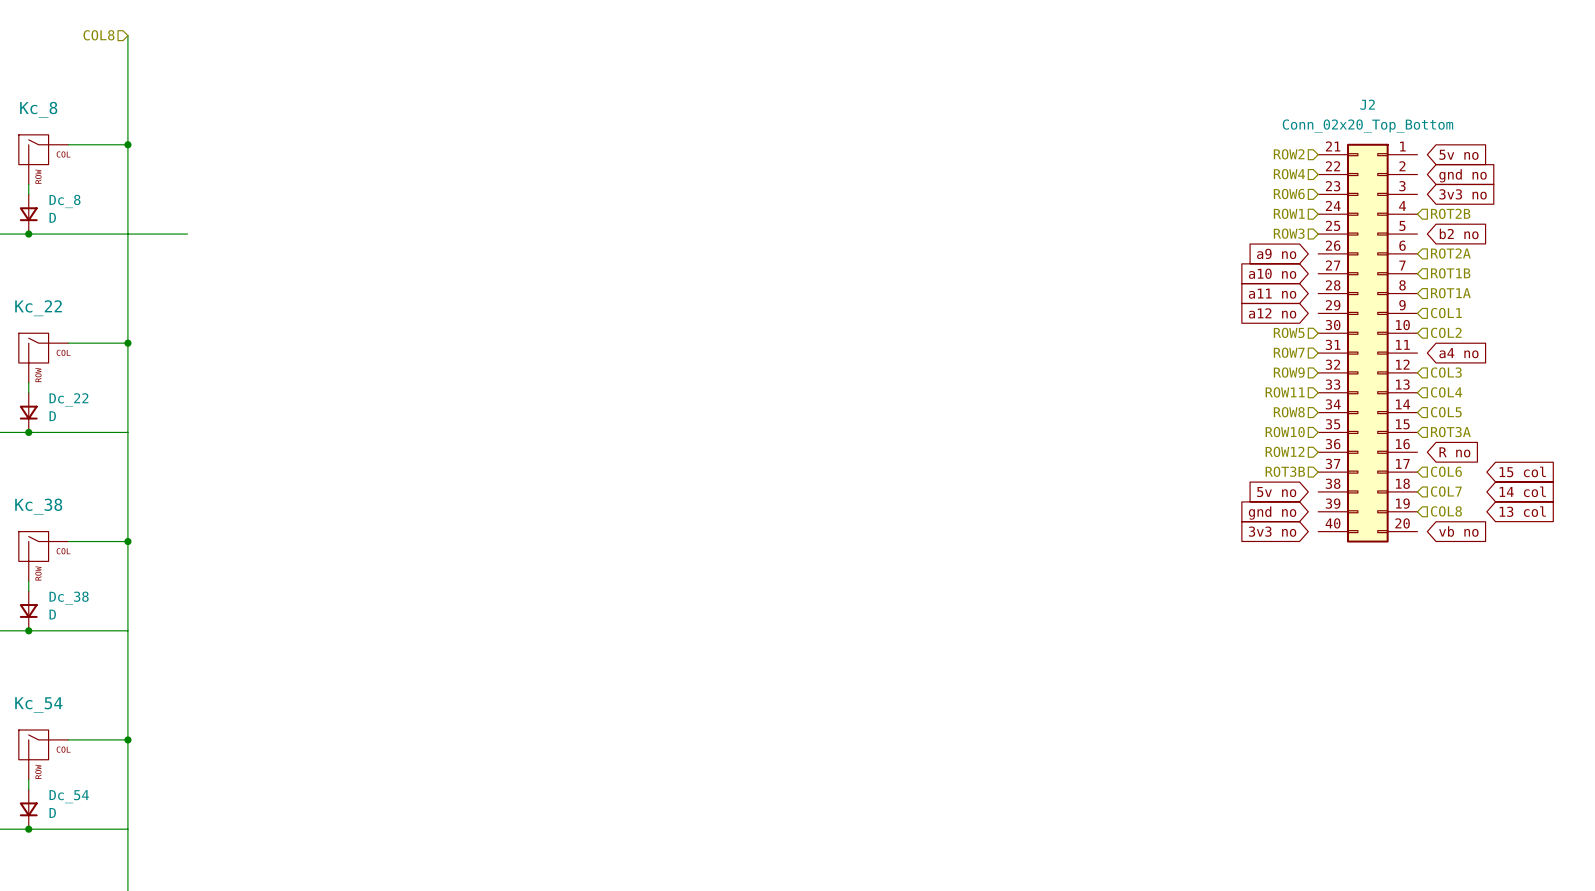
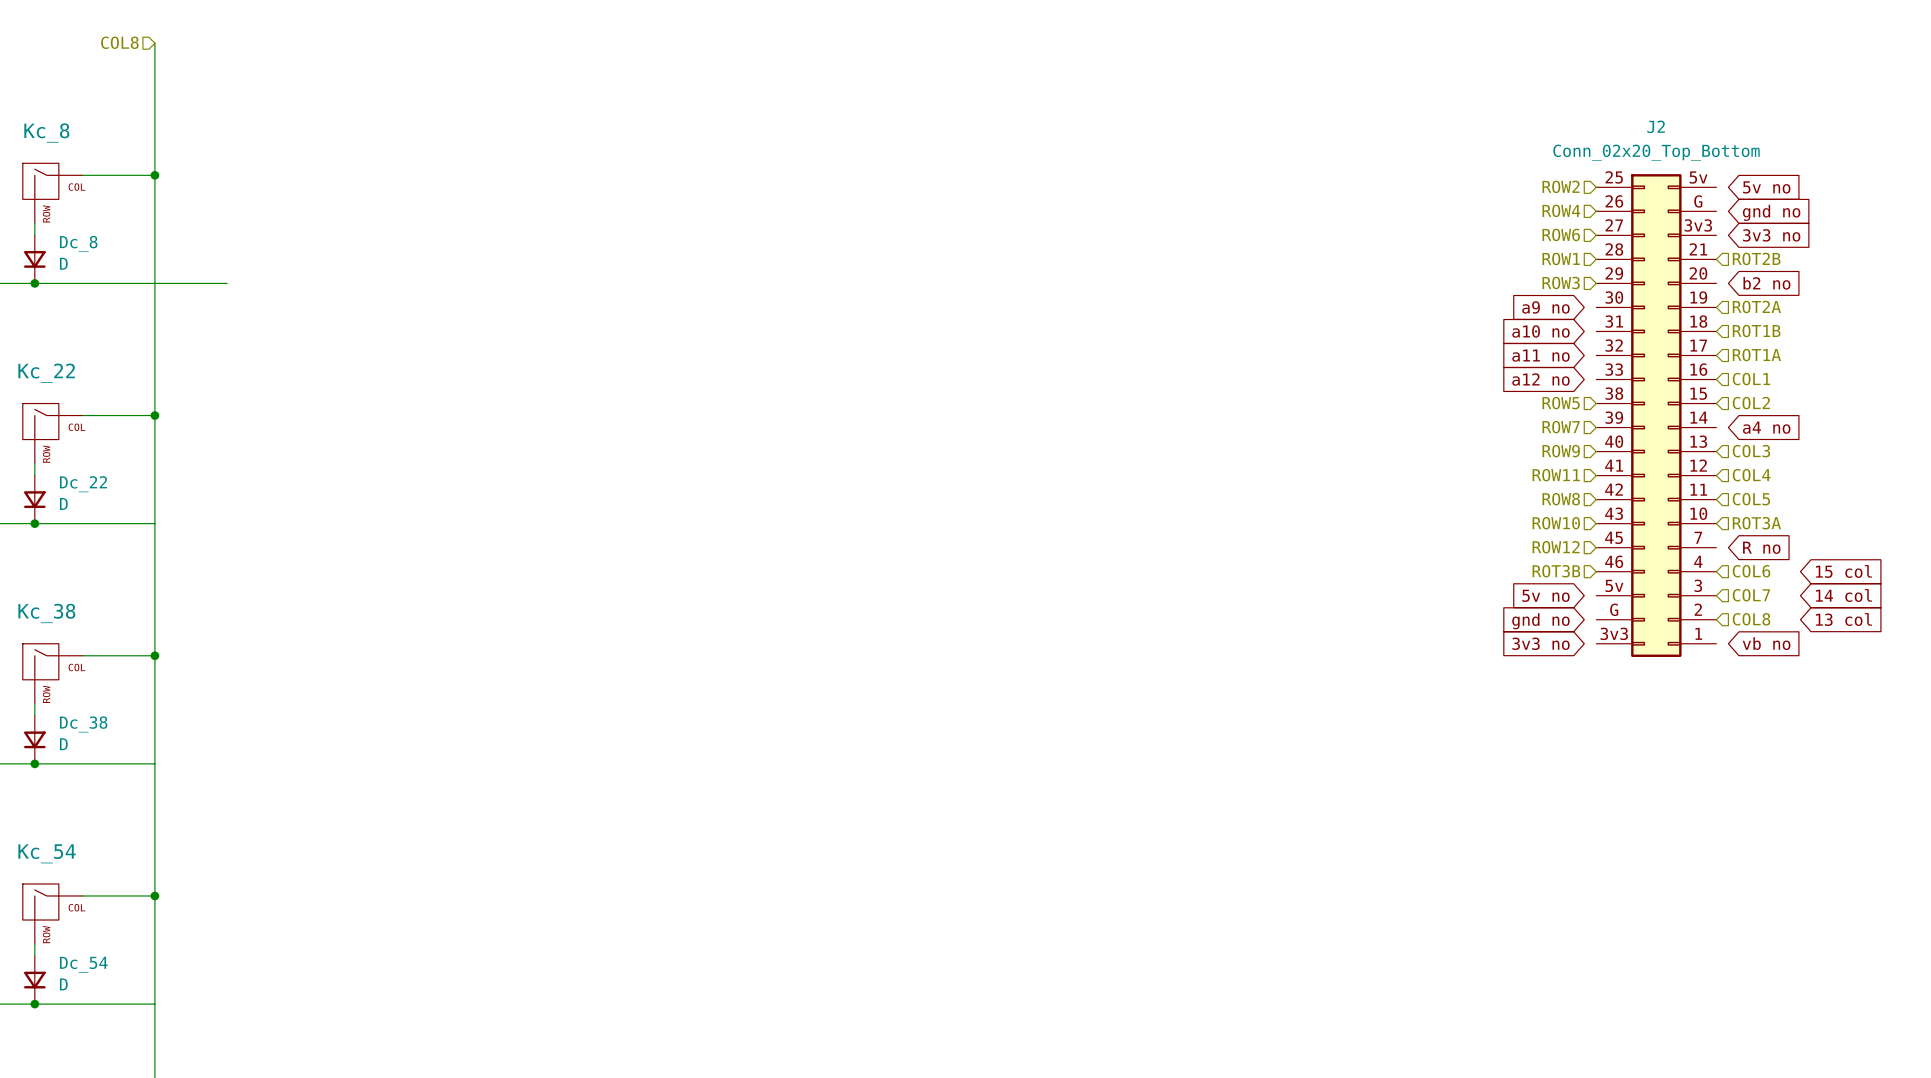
J2 symbol: [1318, 143, 1418, 543] -> [1596, 174, 1717, 657]

